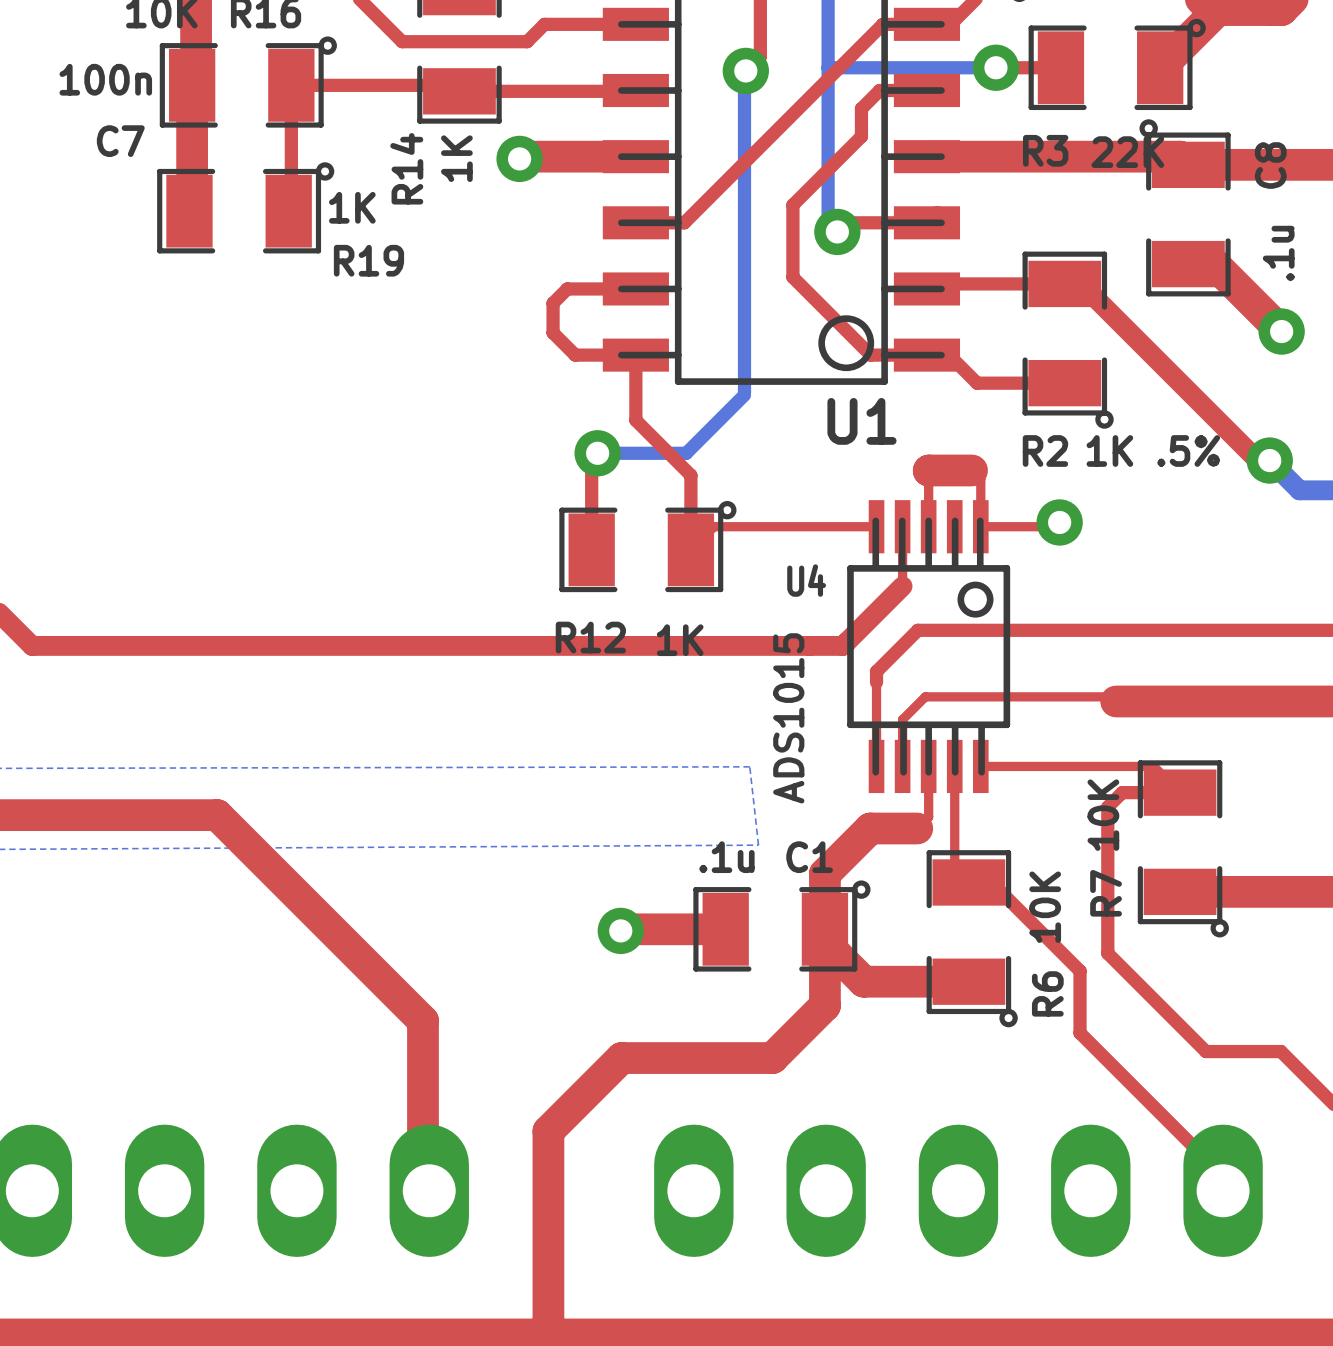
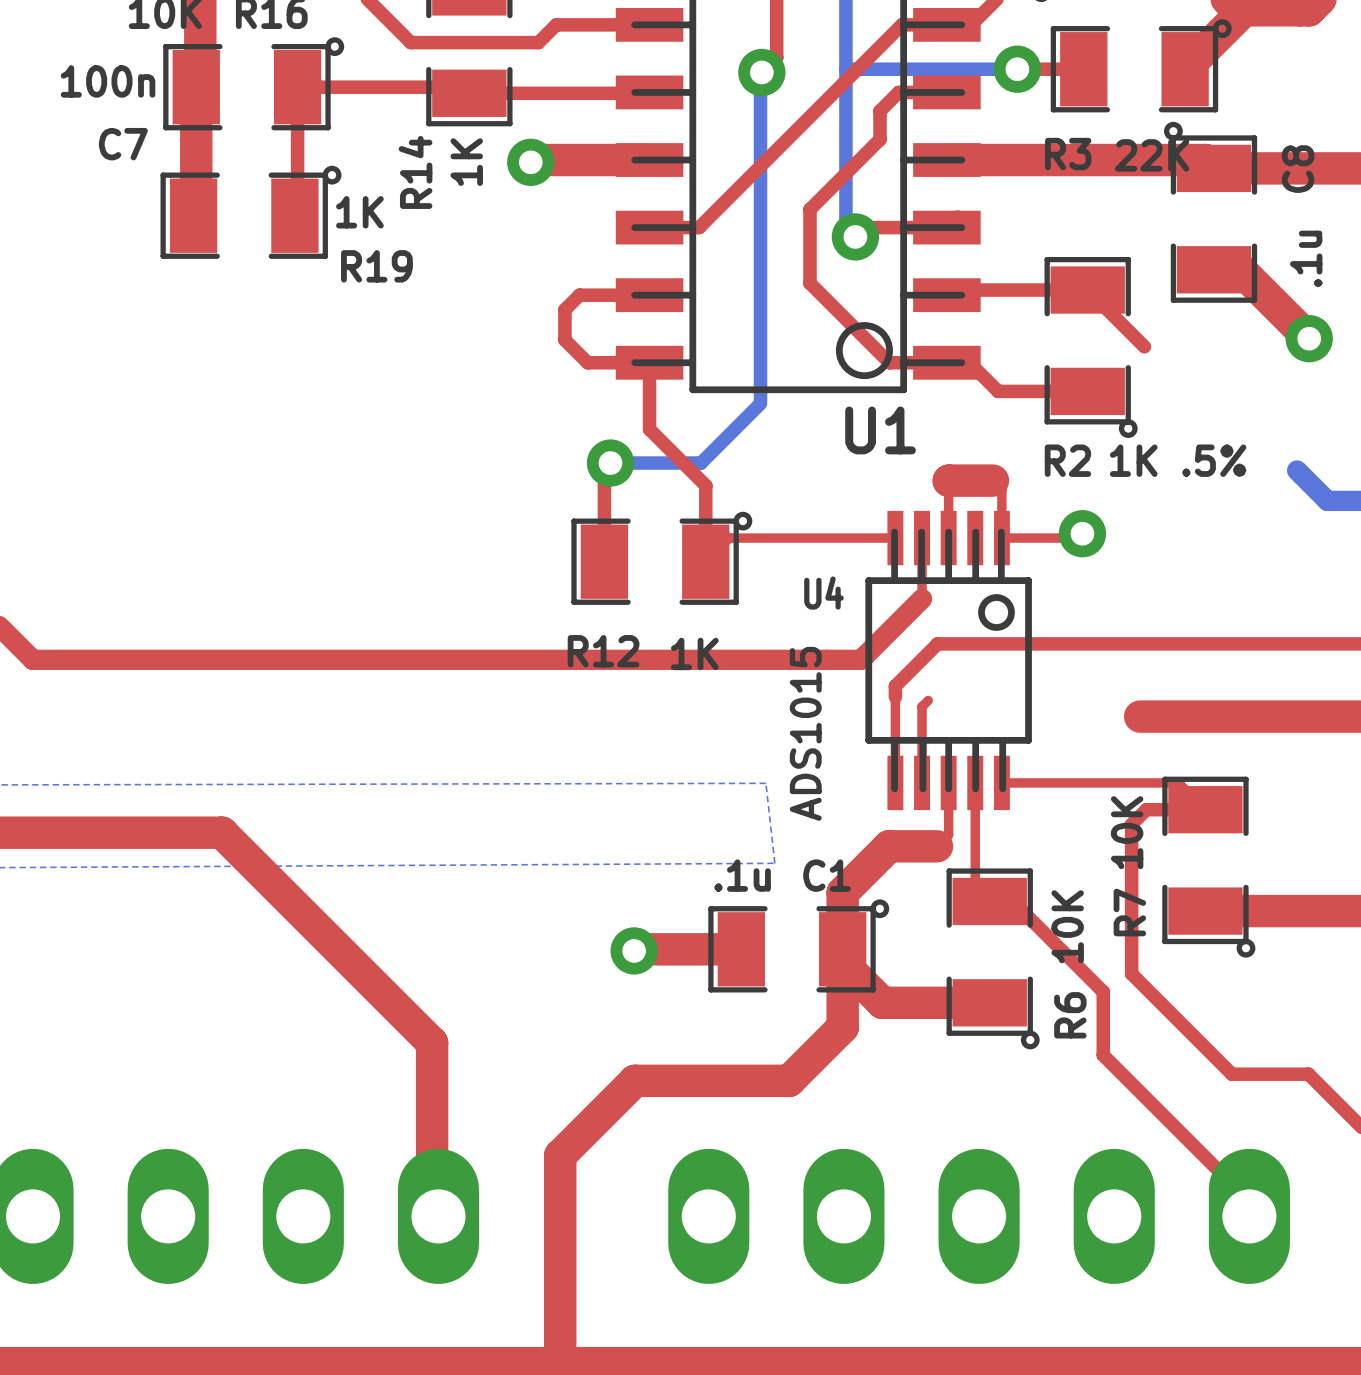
top track: (1064, 283) (1081, 283) (1257, 460) (1269, 460) -> (1087, 290) (1144, 346)
via: (1269, 460) -> none
top track: (1111, 696) (925, 696) (902, 719) -> (928, 700) (922, 706) (922, 735)

